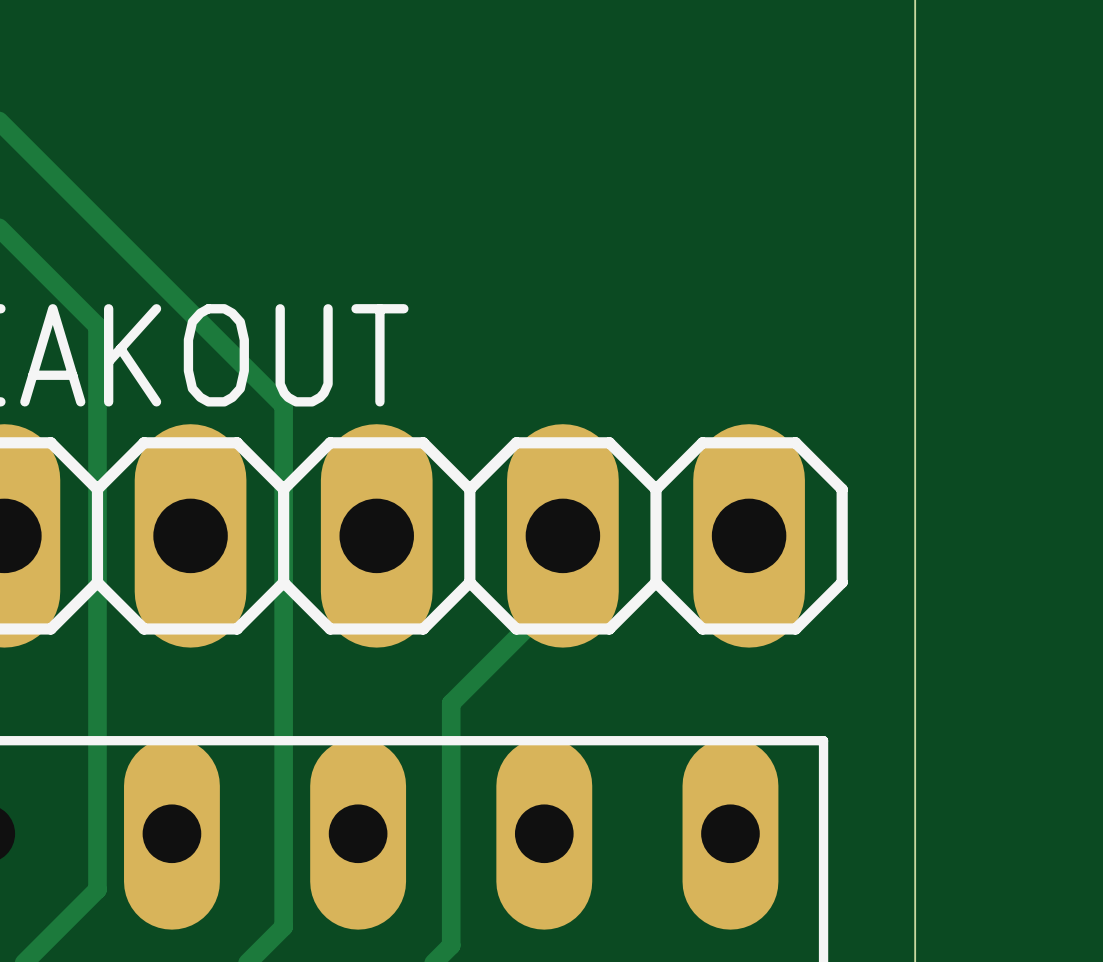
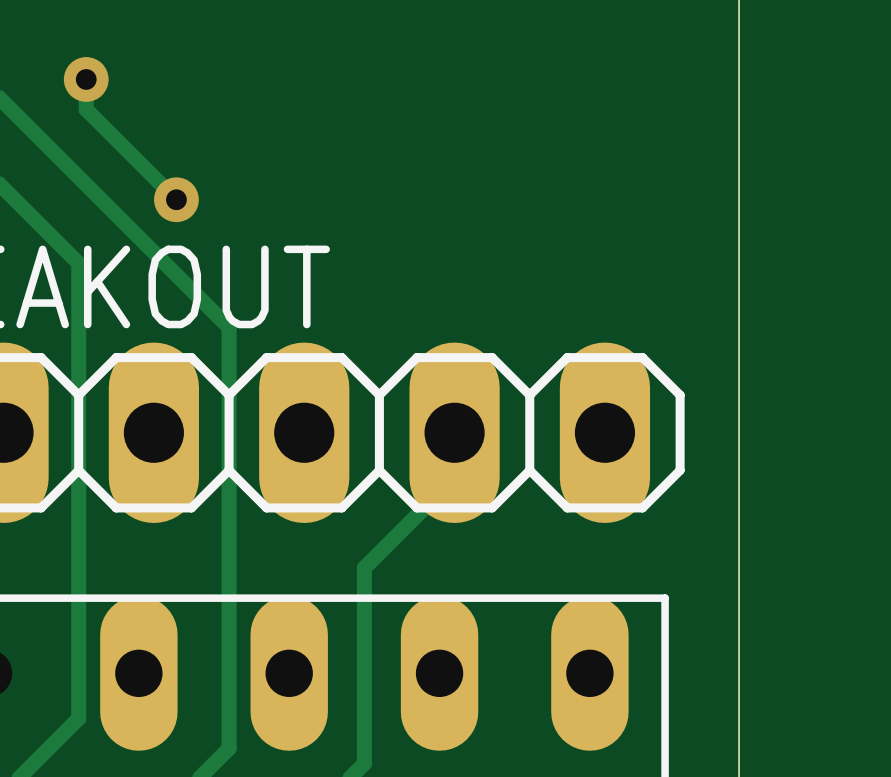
track: none -> (86, 79) (86, 109) (176, 199)
via: none -> (86, 79)
via: none -> (176, 199)

